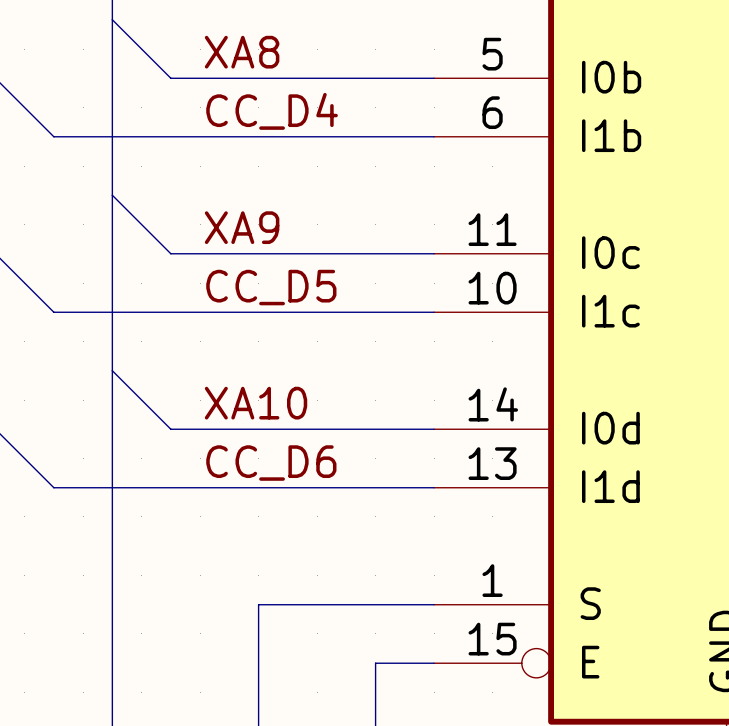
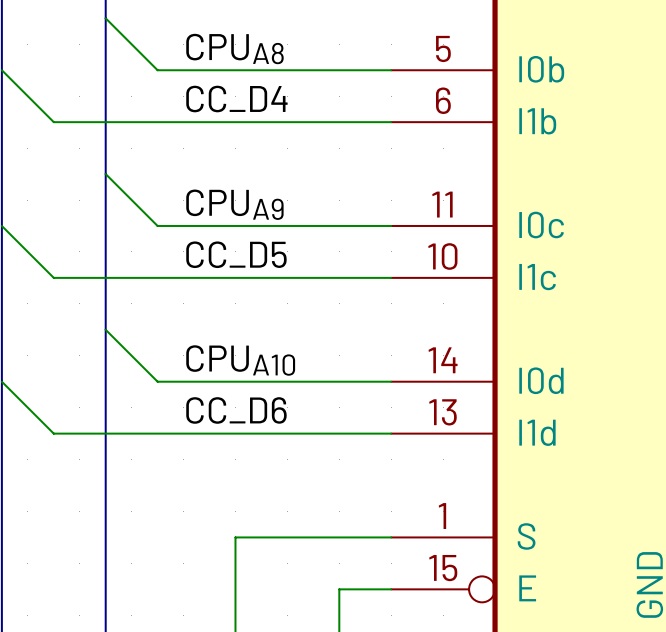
label: XA8 (242, 52) -> CPUA8 (234, 49)
label: XA9 (242, 227) -> CPUA9 (234, 204)
label: XA10 (256, 403) -> CPUA10 (240, 360)

